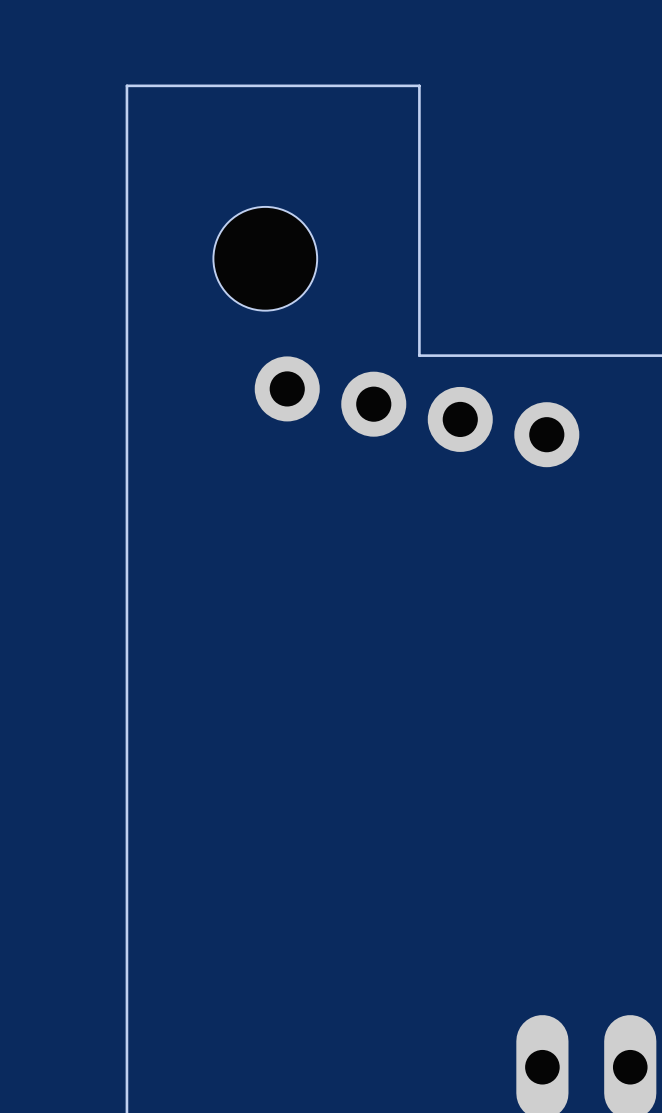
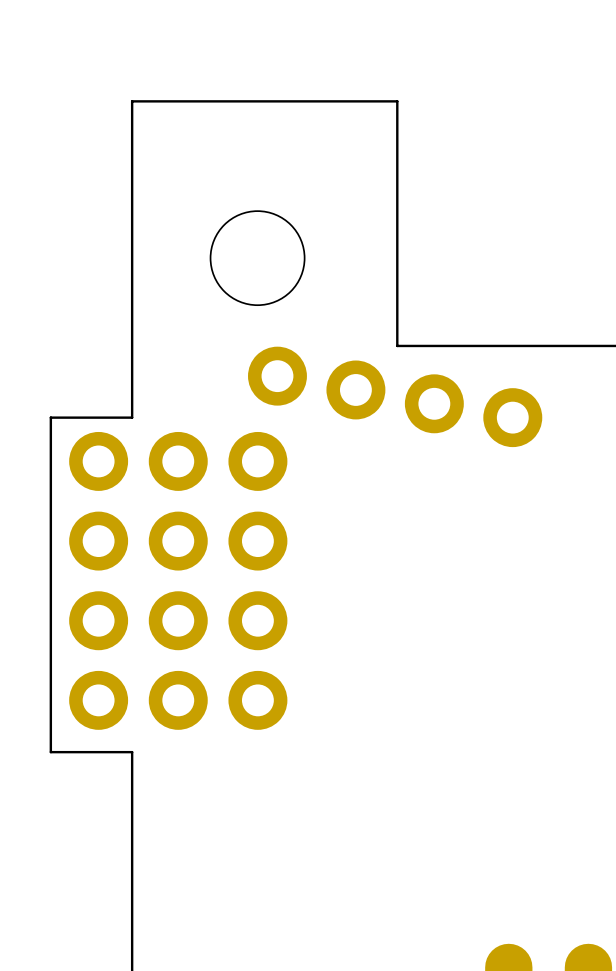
board edge: (126, 434) (126, 803) -> (132, 417) (50, 417) (50, 752) (132, 752)
part: none -> (98, 580)
part: none -> (178, 580)
part: none -> (257, 580)

